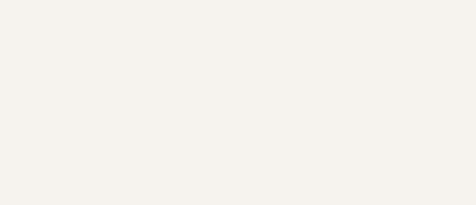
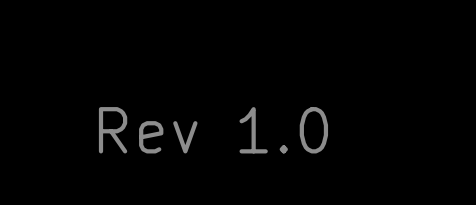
text: none -> Rev 1.0 (213, 130)

